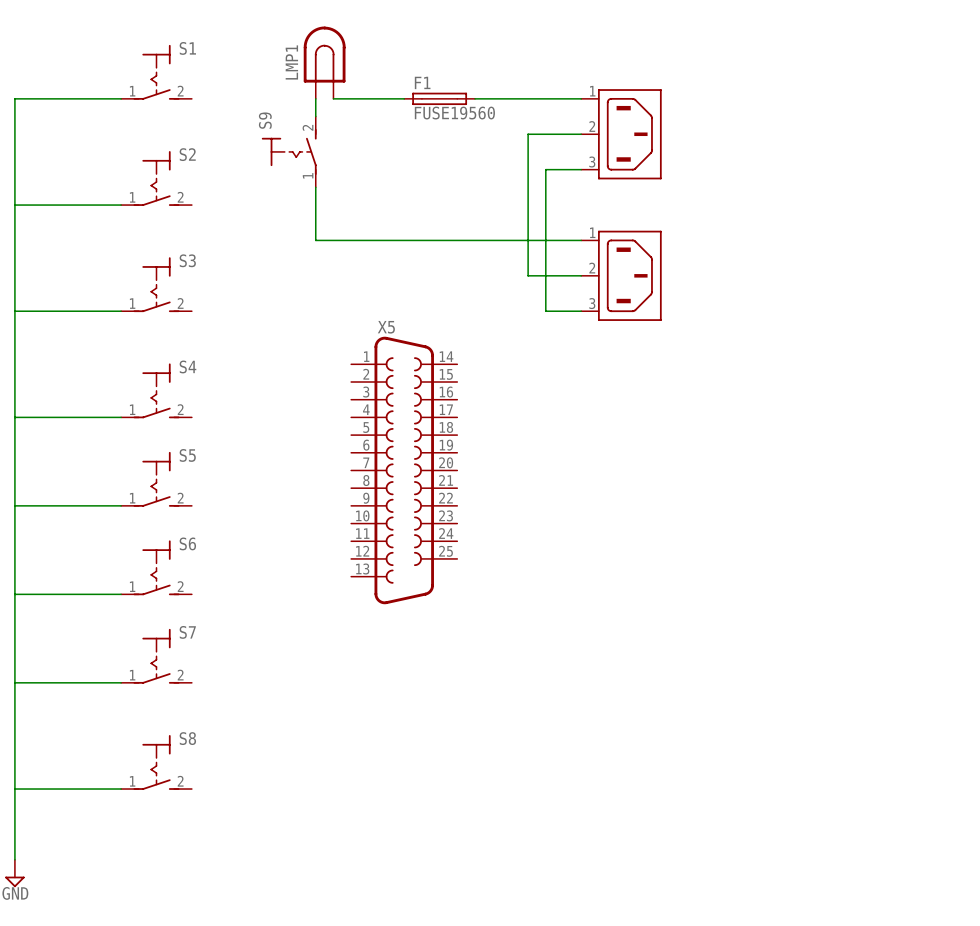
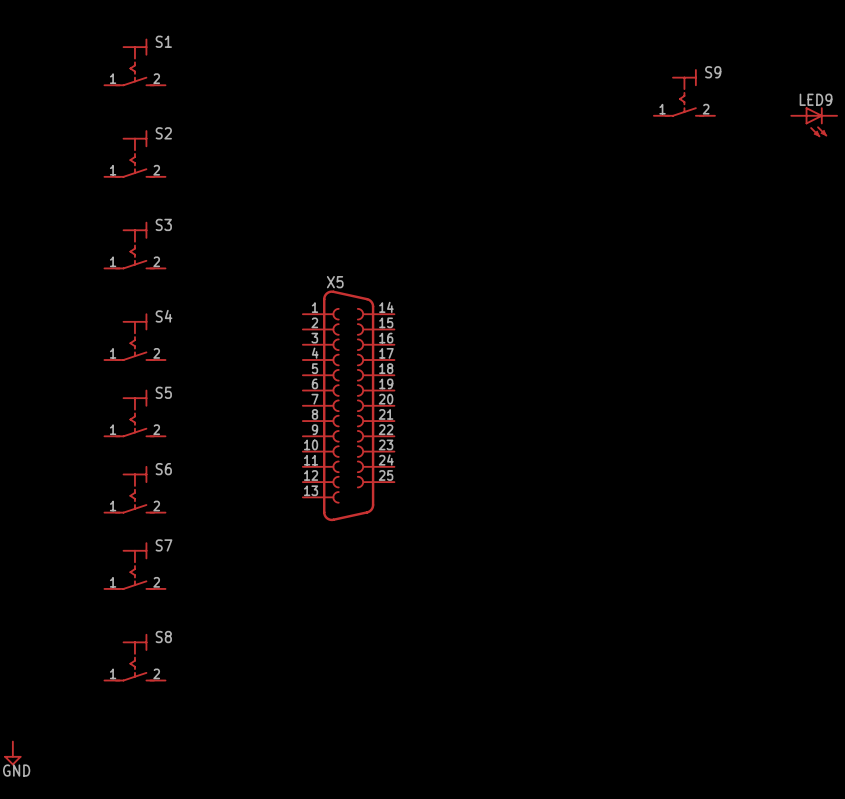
LMP1: (324, 62) -> none
wire: (121, 98) (14, 98) (14, 859) -> none
wire: (315, 98) (315, 116) -> none
wire: (333, 98) (404, 98) -> none
F1: FUSE19560 (439, 98) -> none
wire: (475, 98) (581, 98) -> none
wire: (581, 134) (528, 134) (528, 275) (581, 275) -> none
part: (621, 134) -> none
LED9: none -> (814, 122)
S9 rotation: 0° (289, 151) -> 90° clockwise (684, 92)
S9 position: (289, 151) -> (684, 92)
wire: (581, 169) (545, 169) (545, 311) (581, 311) -> none
wire: (315, 187) (315, 240) (581, 240) -> none
wire: (14, 205) (121, 205) -> none
part: (621, 275) -> none
wire: (14, 311) (121, 311) -> none
wire: (14, 417) (121, 417) -> none
wire: (14, 505) (121, 505) -> none
wire: (14, 594) (121, 594) -> none
wire: (14, 682) (121, 682) -> none
wire: (14, 789) (121, 789) -> none

